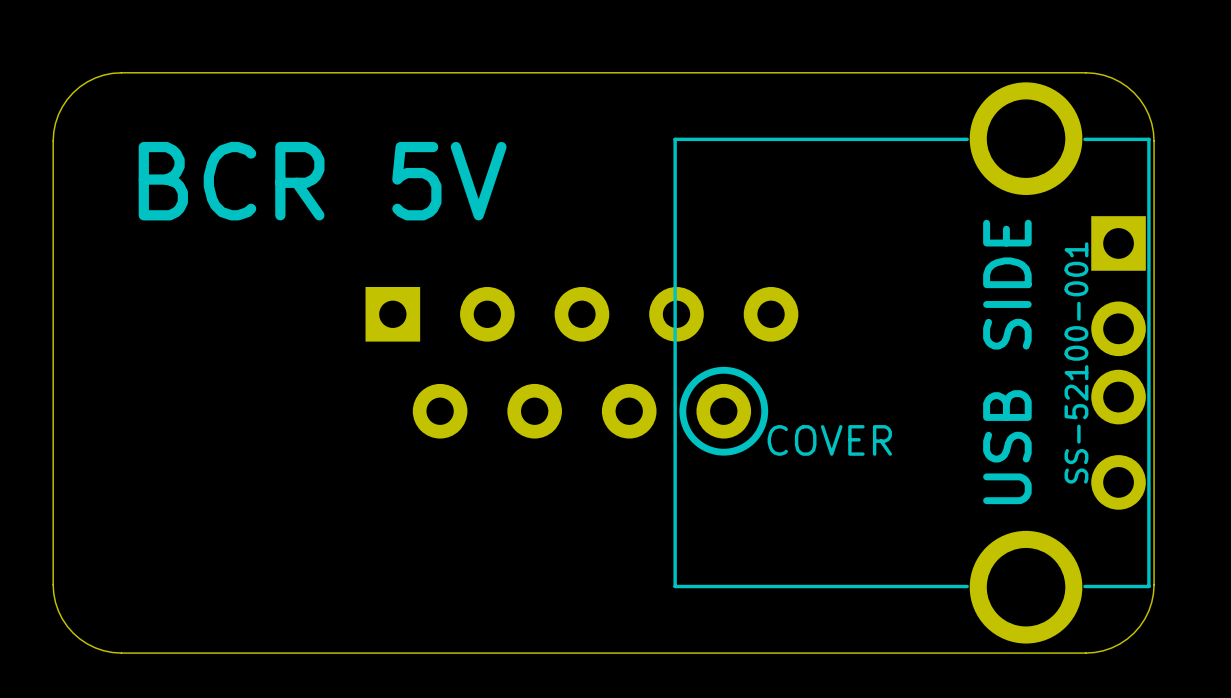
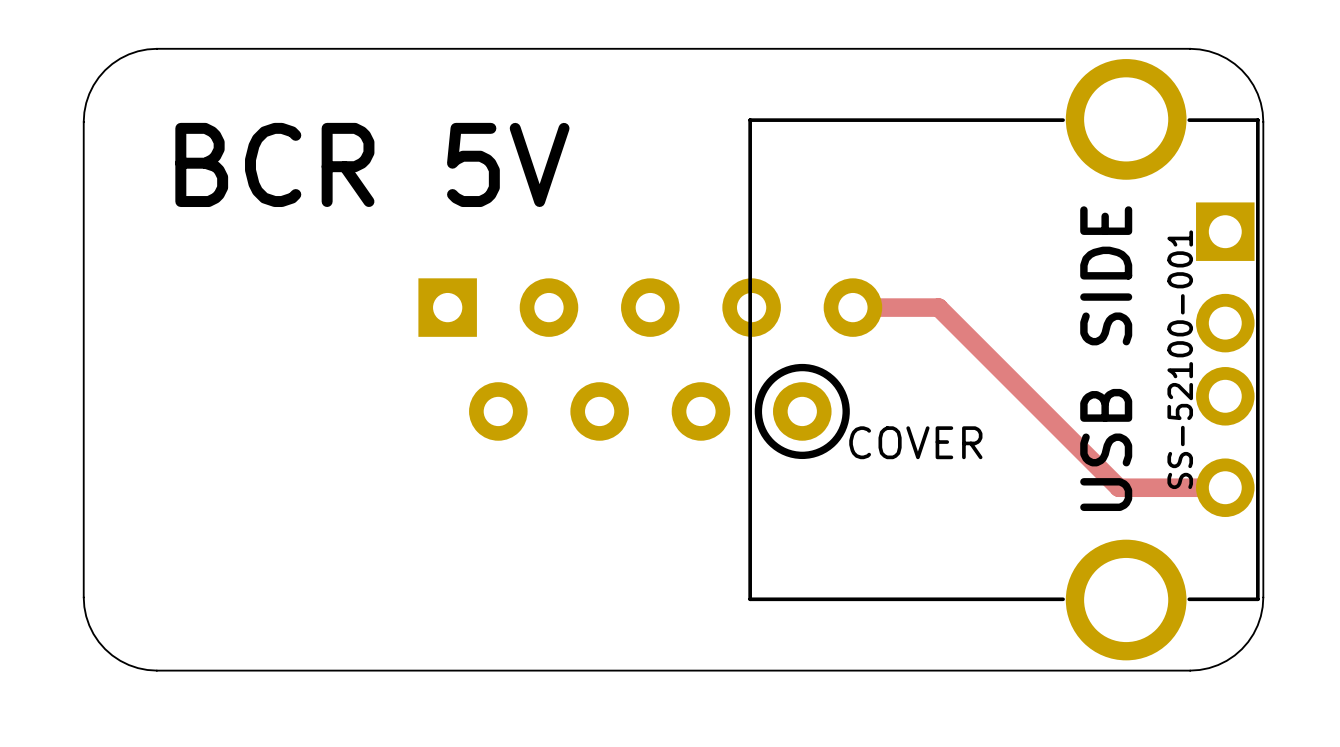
track: none -> (852, 307) (938, 307) (1118, 487) (1225, 487)

